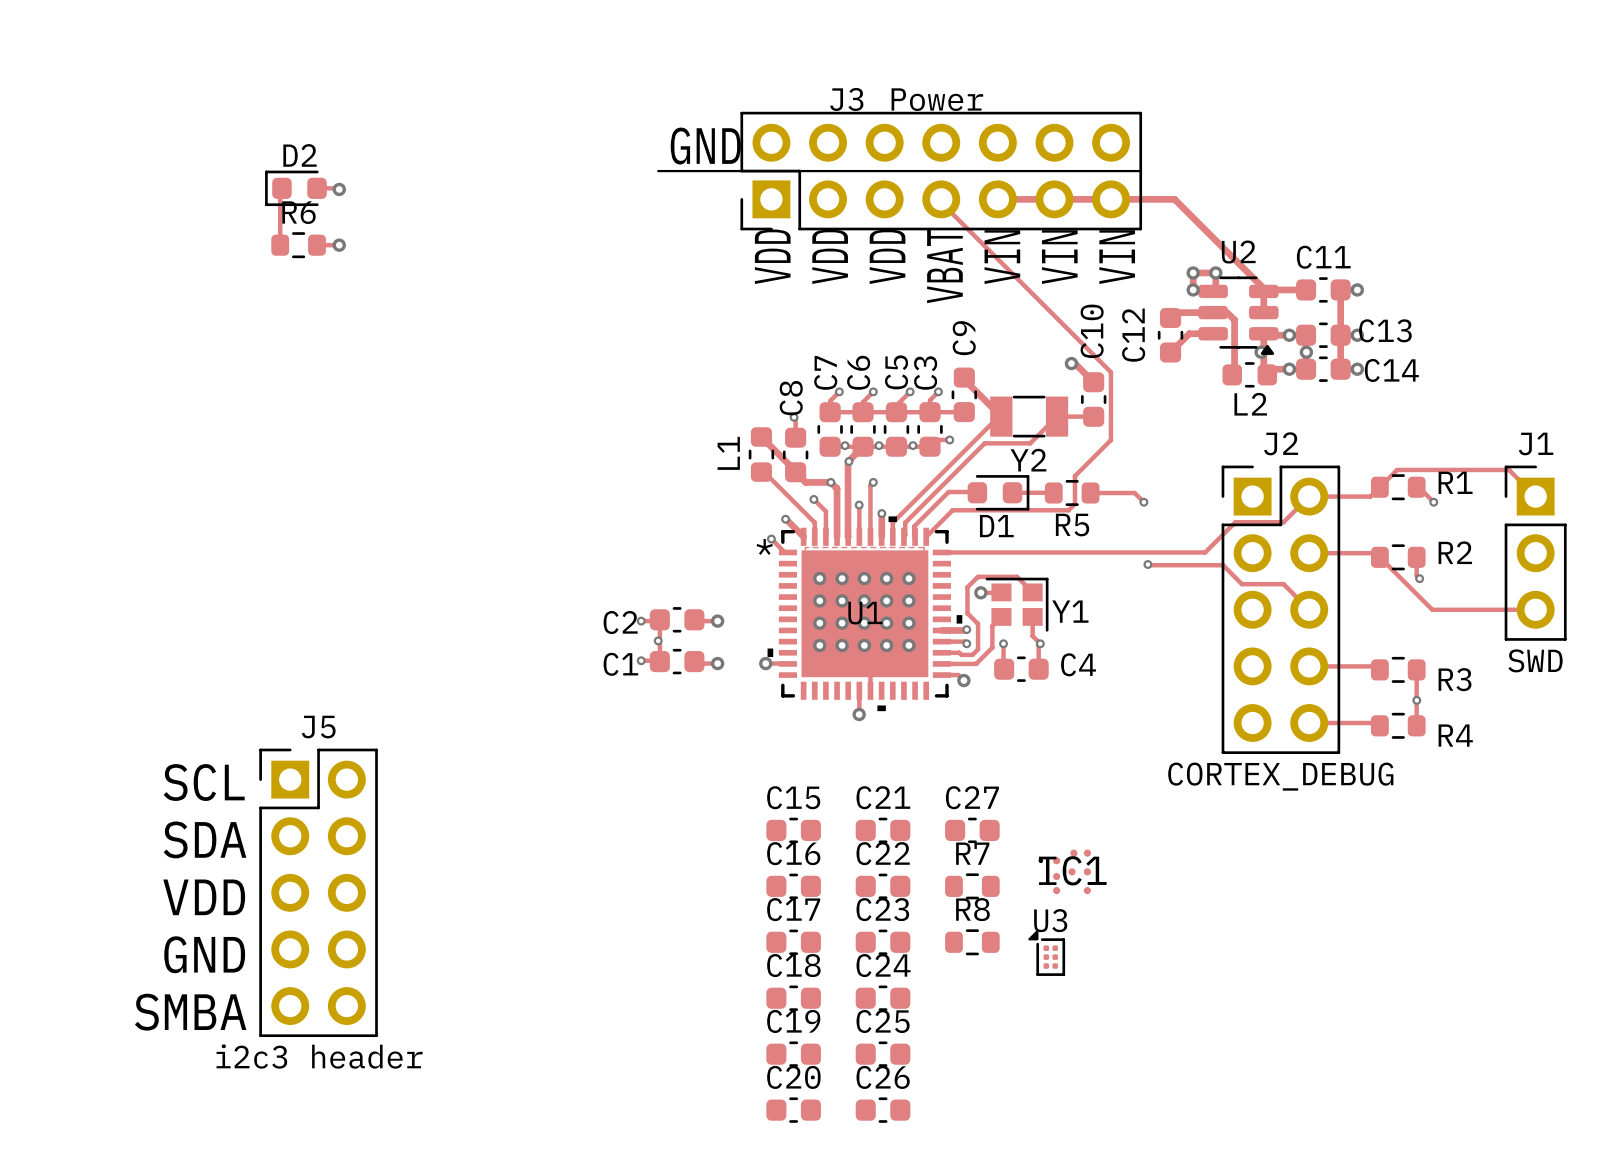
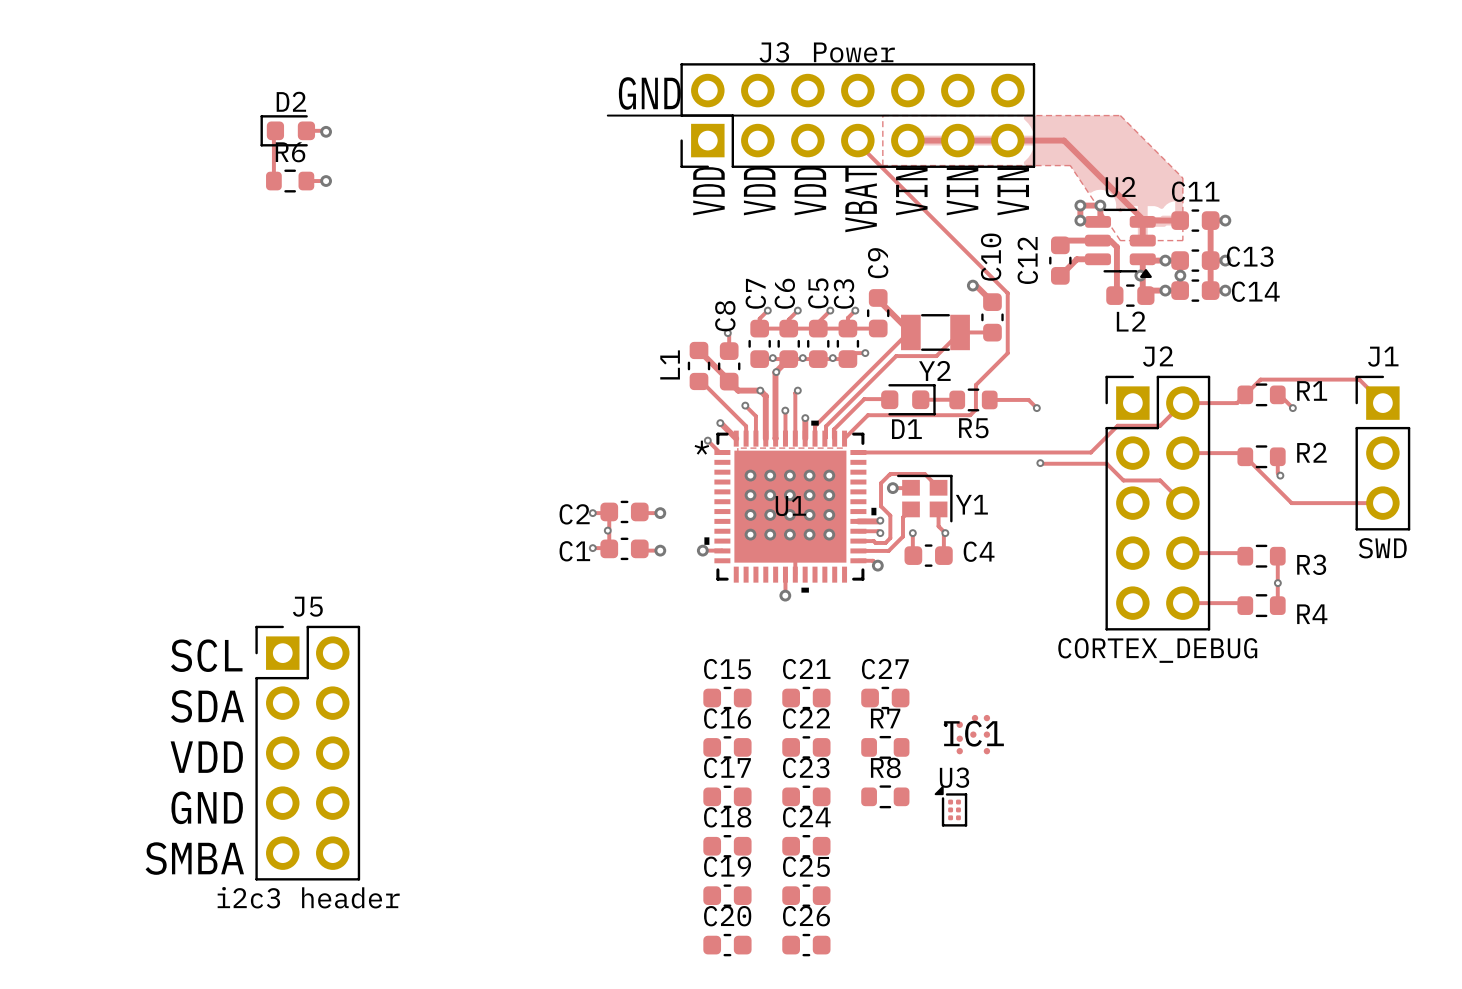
zone outline: none -> (882, 115) (882, 165) (1070, 165) (1120, 240) (1182, 240) (1182, 178) (1120, 115) (882, 115)

